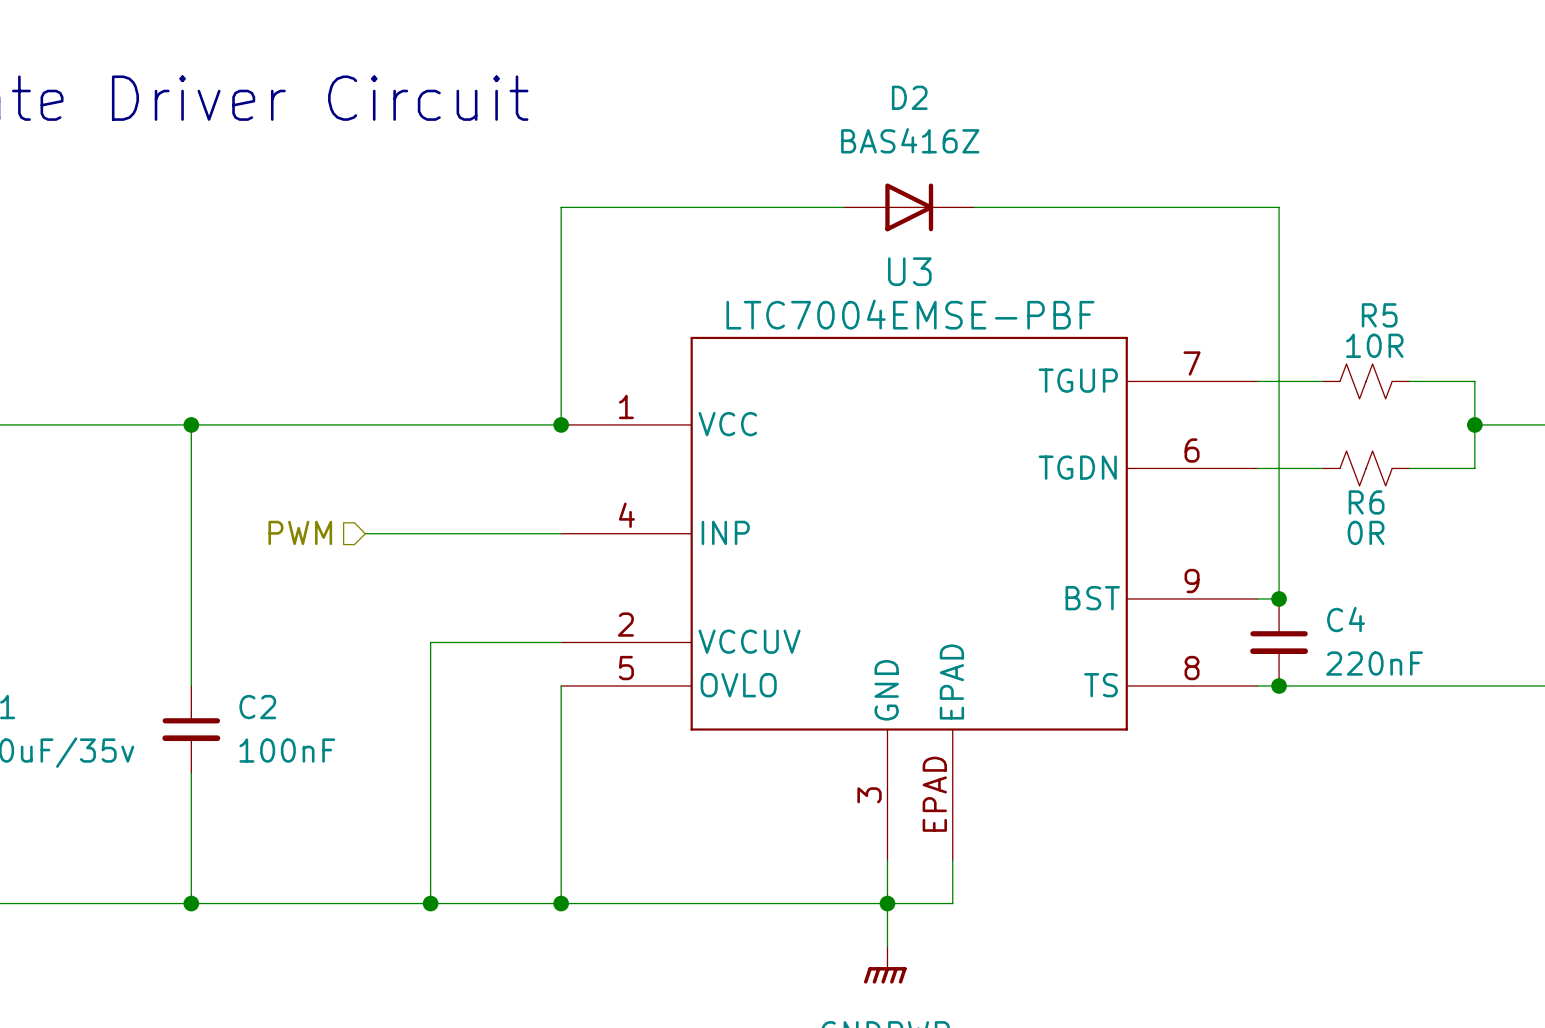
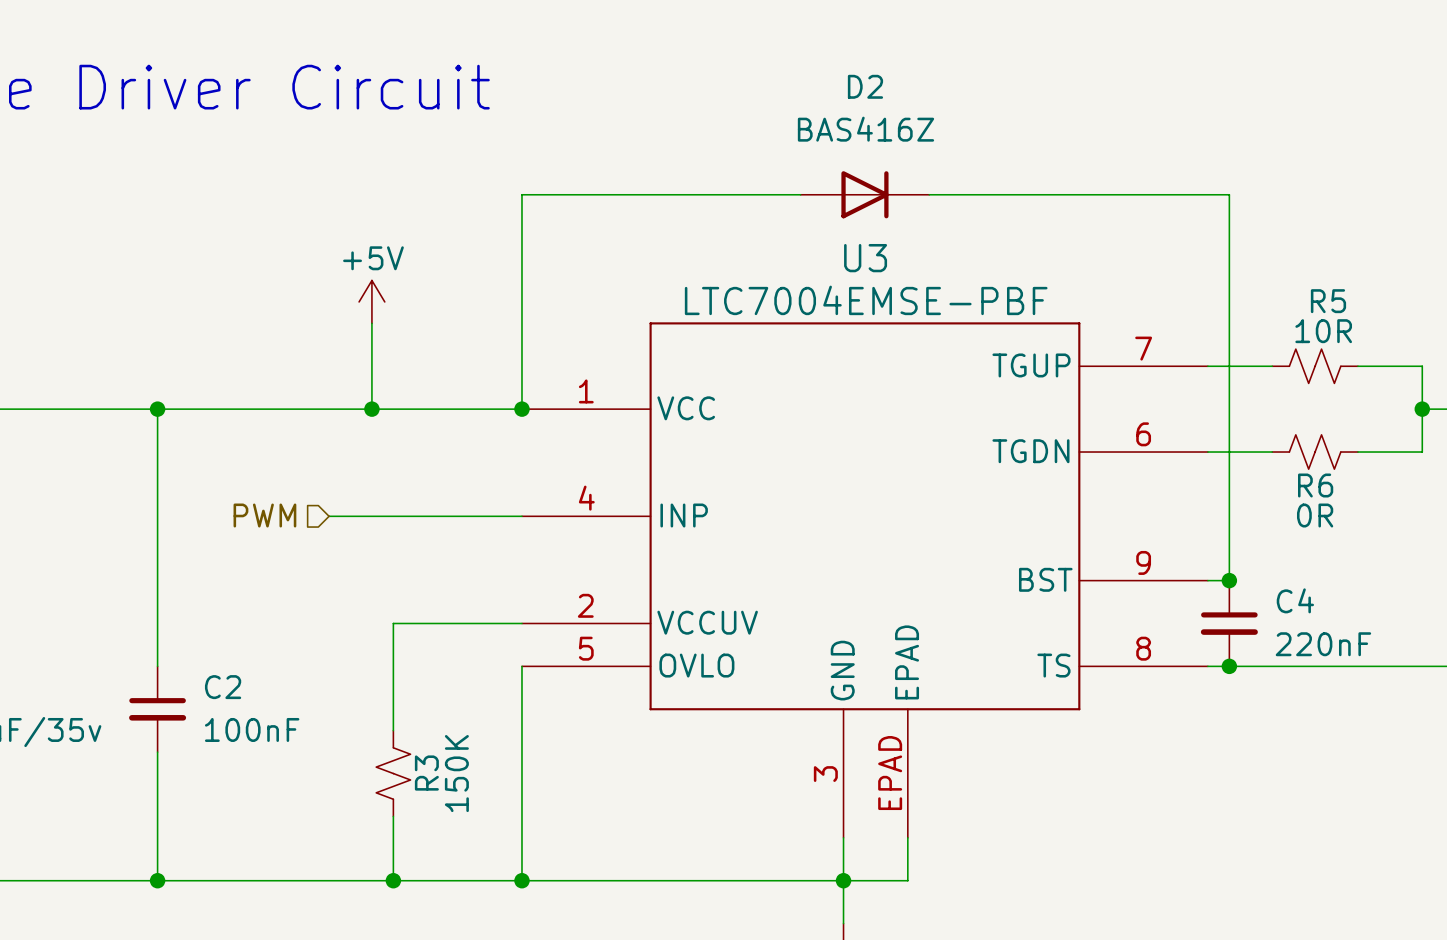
power symbol: none -> +5V (371, 301)
junction: none -> (371, 409)
wire: (430, 751) (430, 838) -> (371, 323) (371, 409)
R3: none -> 150K (393, 773)

